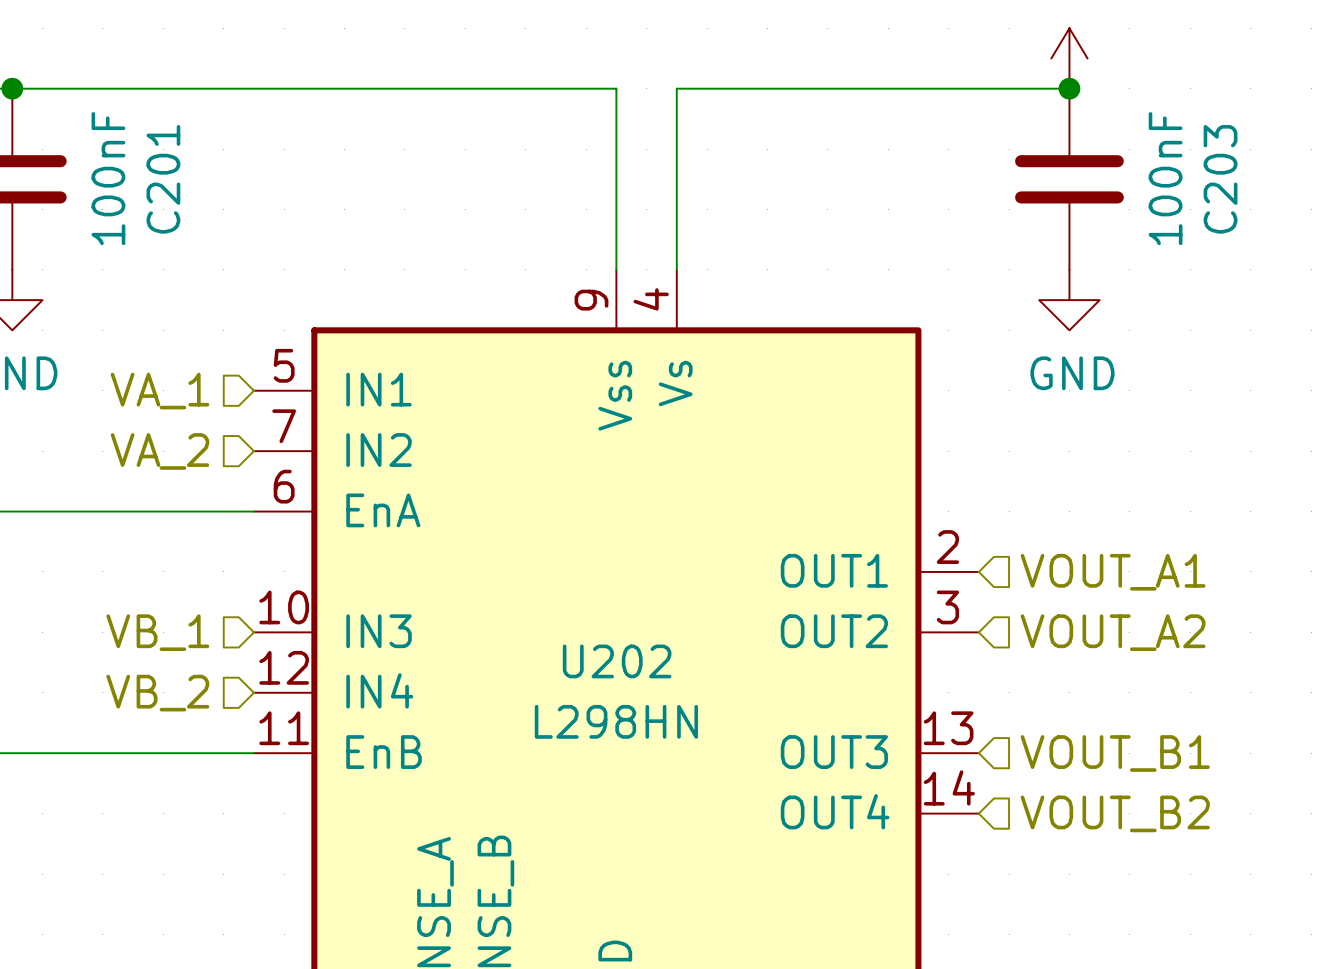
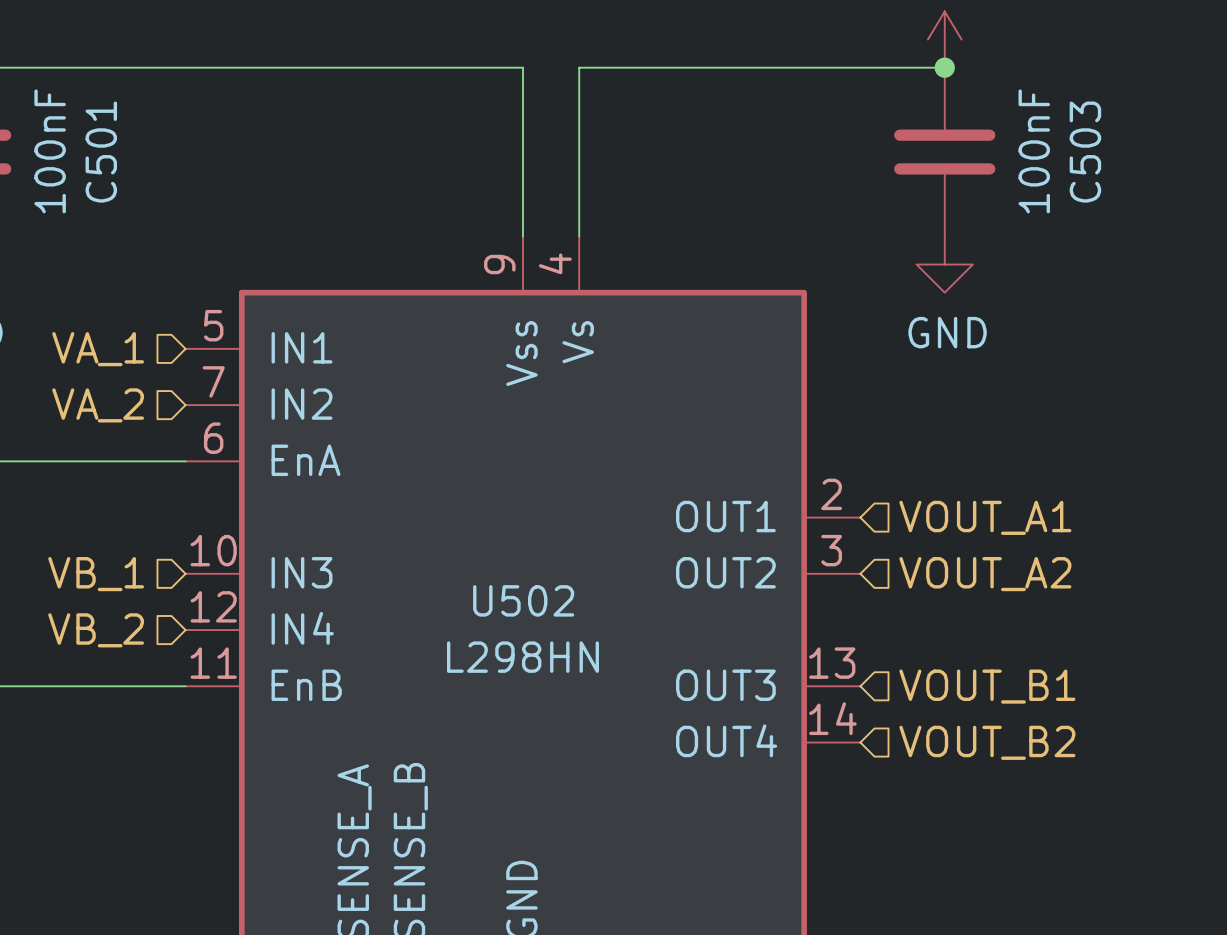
C201 name: C201 (163, 179) -> C501 (101, 152)
C203 name: C203 (1220, 179) -> C503 (1085, 152)
U202 name: U202 (617, 661) -> U502 (523, 600)

